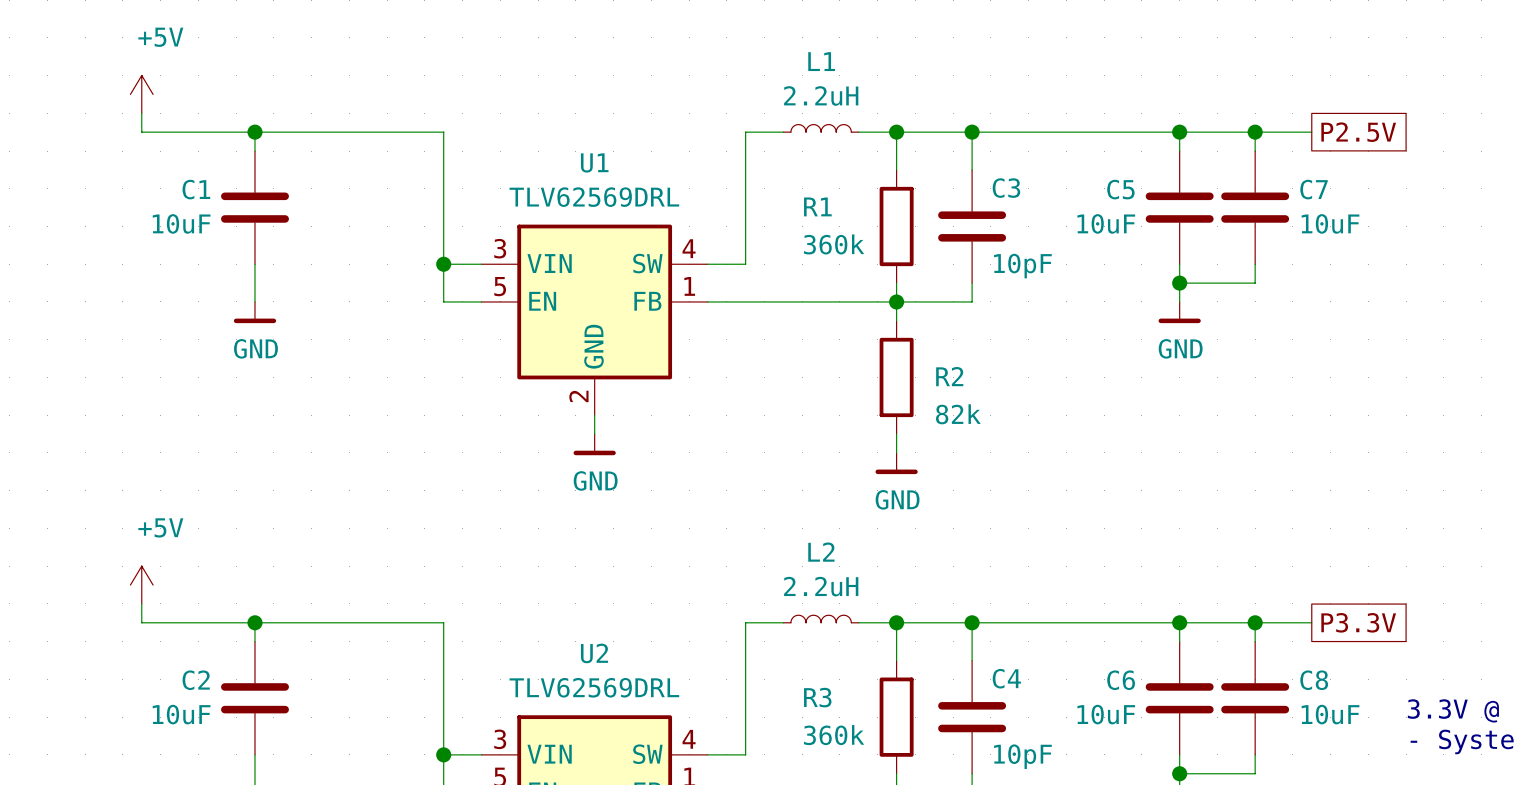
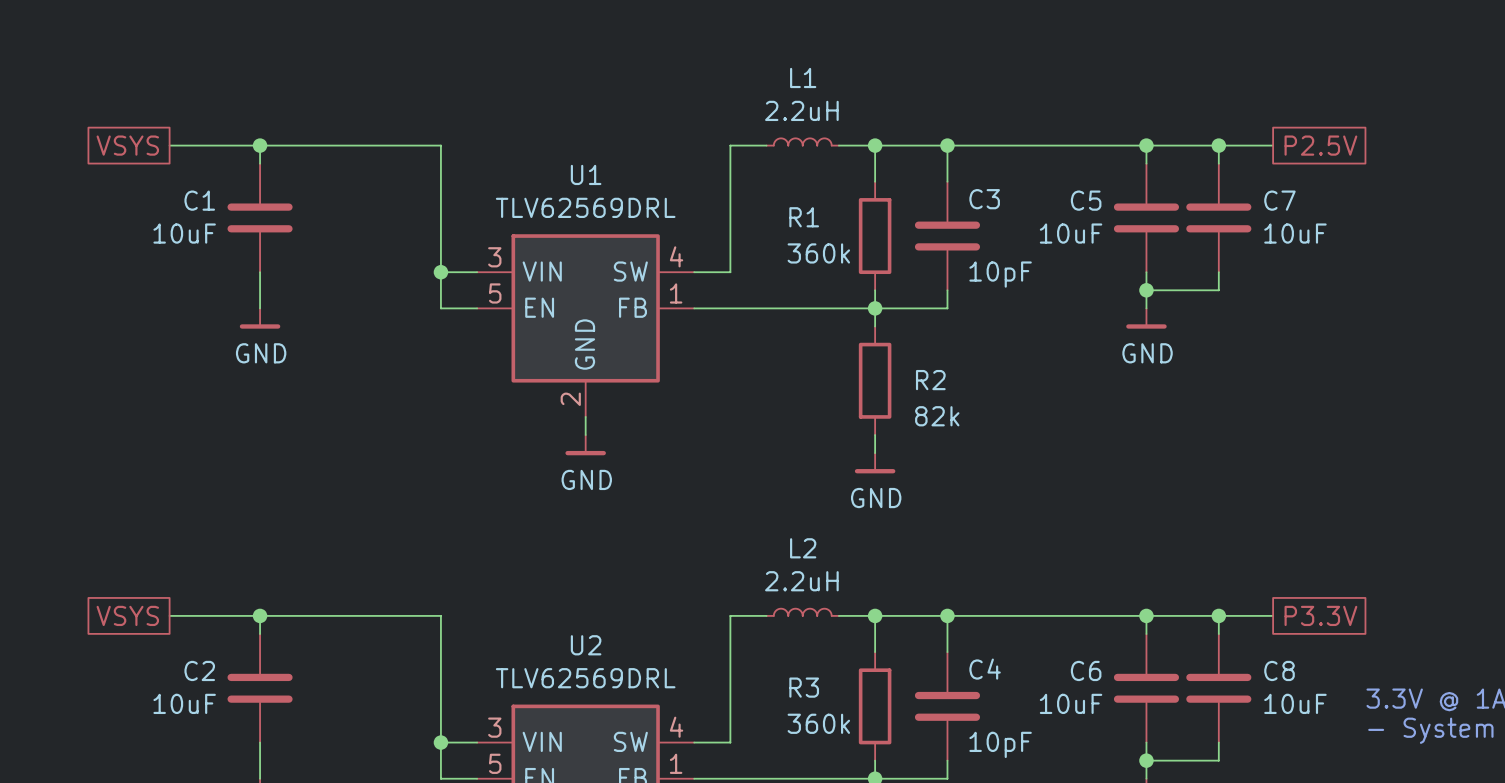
power symbol: +5V (141, 94) -> none
wire: (141, 113) (141, 132) (160, 132) -> none
global label: none -> VSYS (127, 145)
power symbol: +5V (141, 585) -> none
wire: (141, 603) (141, 622) (160, 622) -> none
global label: none -> VSYS (127, 615)

